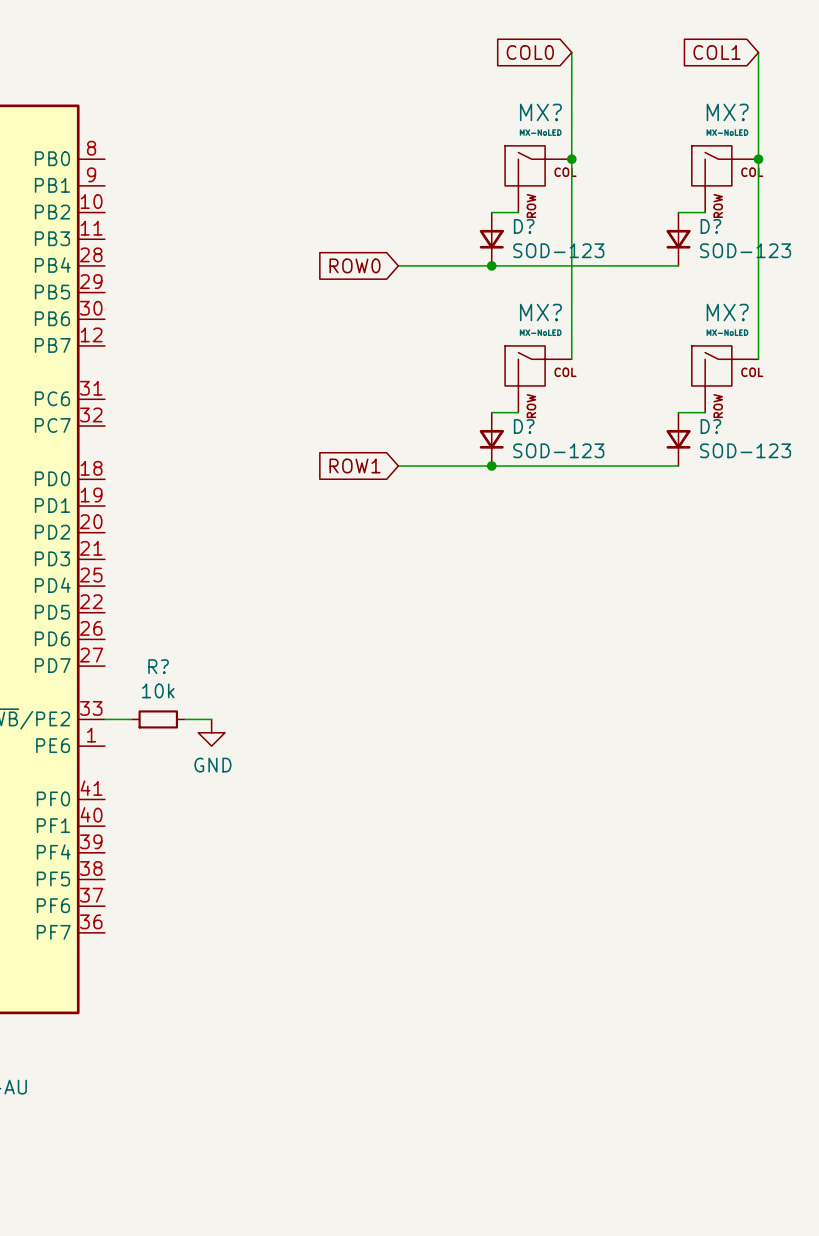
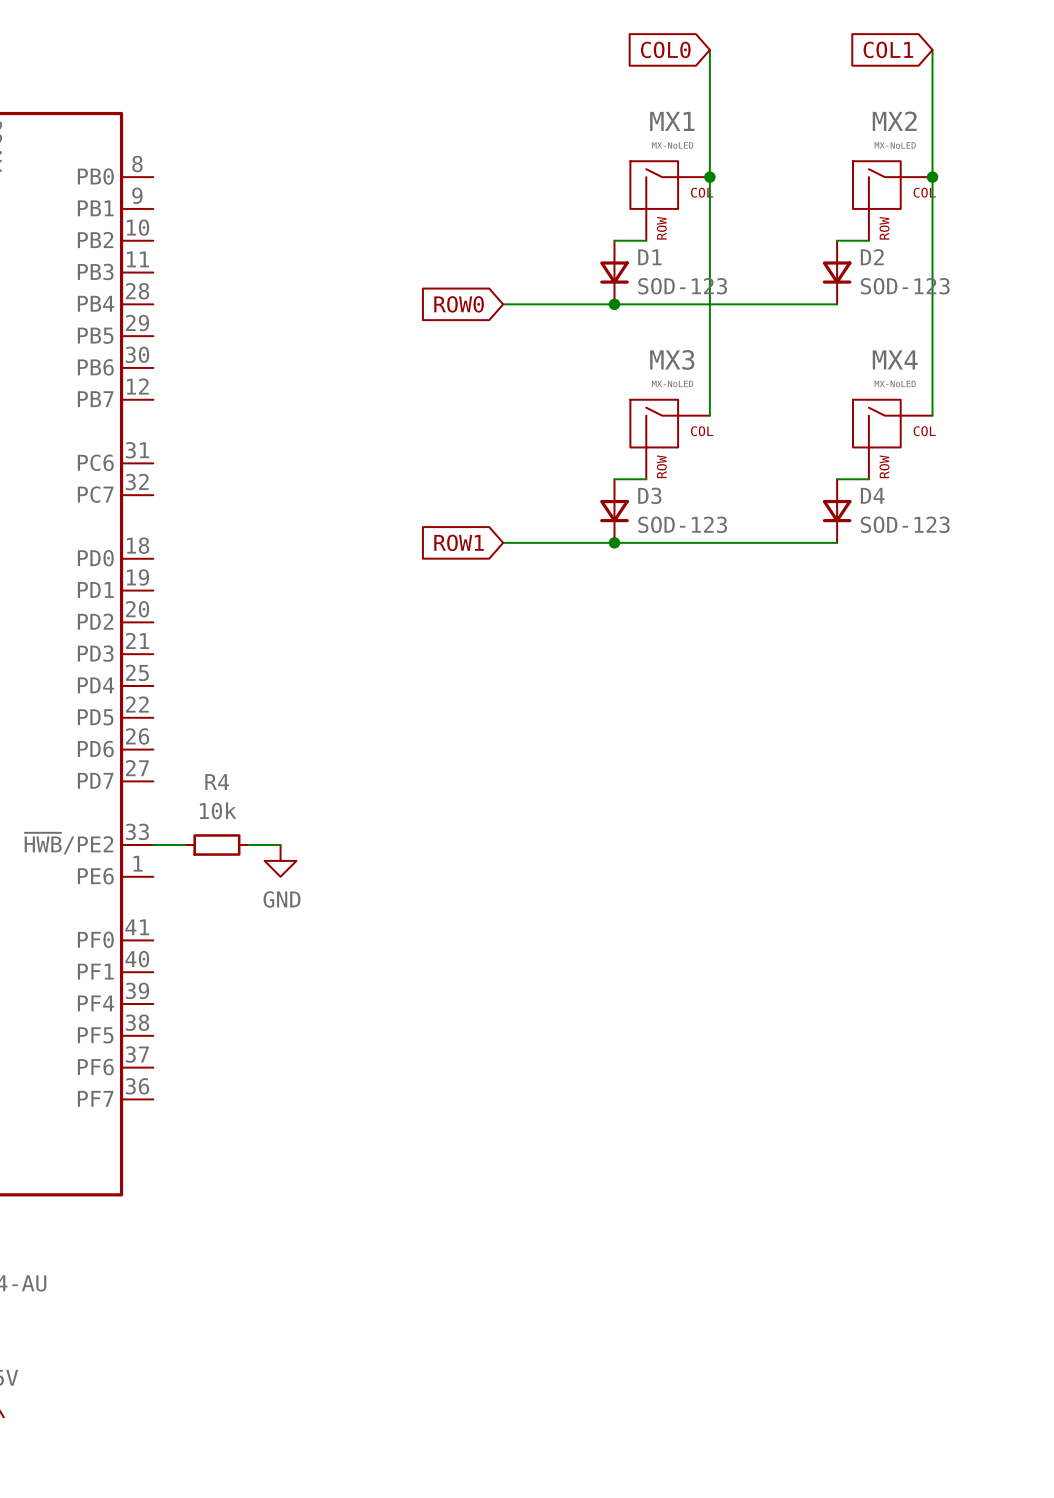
MX? name: MX? (540, 112) -> MX1 (672, 121)
MX? name: MX? (727, 112) -> MX2 (894, 121)
D? name: D? (524, 226) -> D1 (649, 257)
D? name: D? (710, 226) -> D2 (872, 257)
MX? name: MX? (540, 312) -> MX3 (672, 359)
MX? name: MX? (727, 312) -> MX4 (895, 359)
D? name: D? (524, 426) -> D3 (649, 495)
D? name: D? (710, 426) -> D4 (872, 495)
R? name: R? (158, 666) -> R4 (217, 782)

